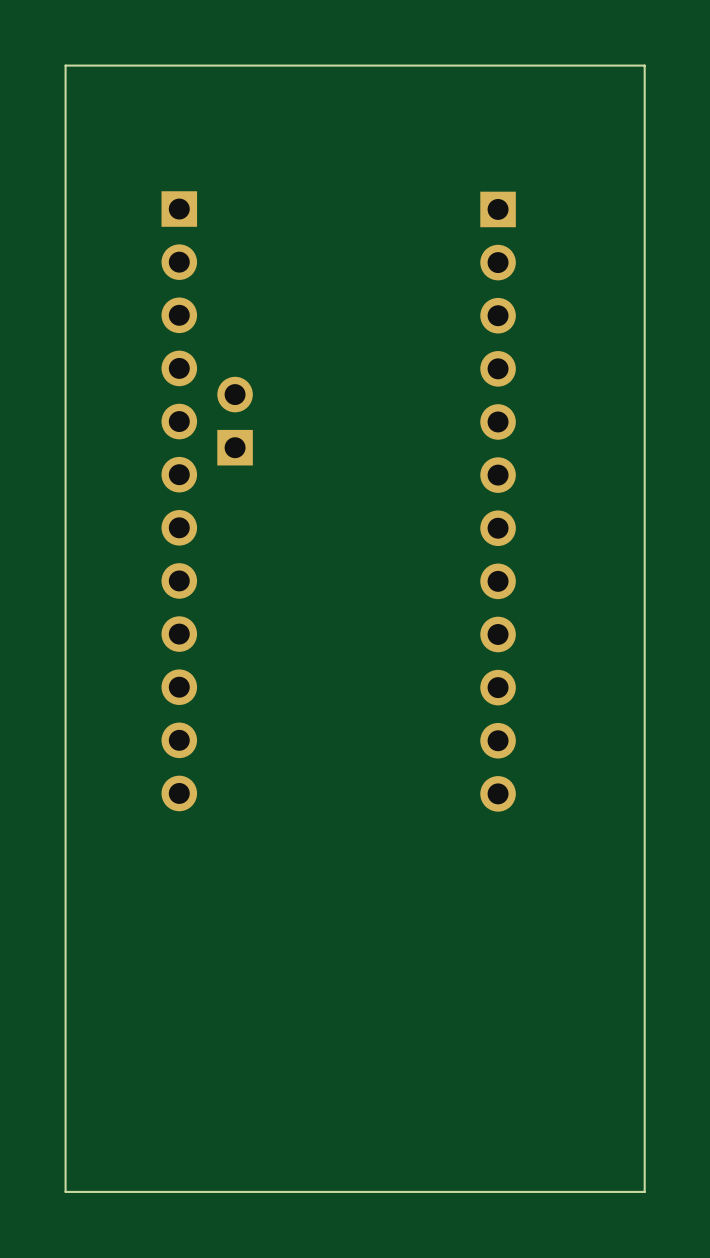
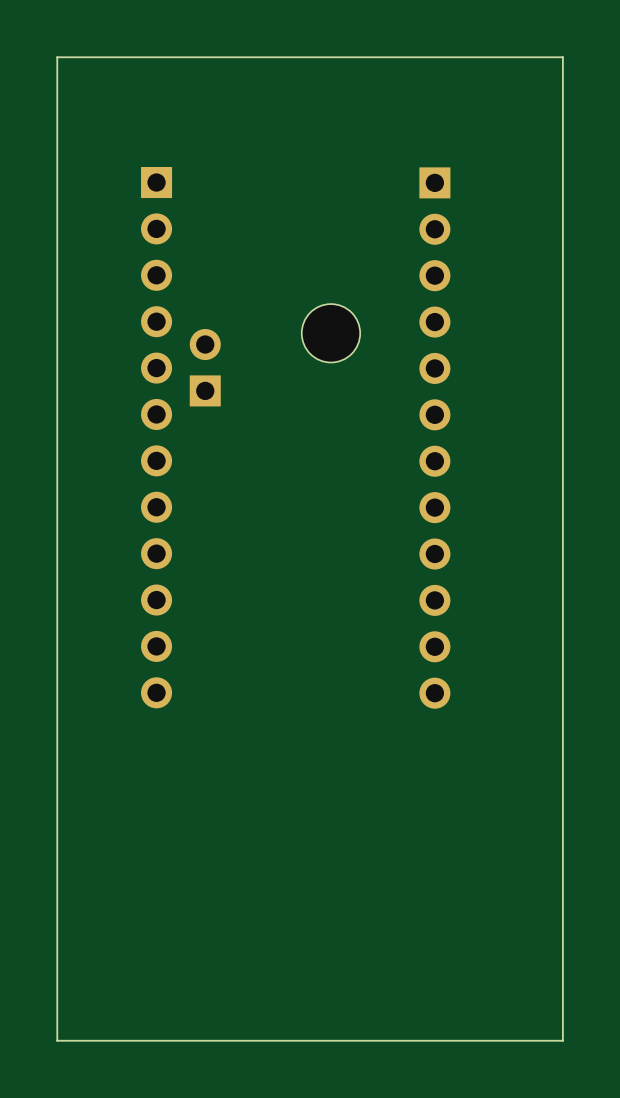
part: none -> (330, 333)

